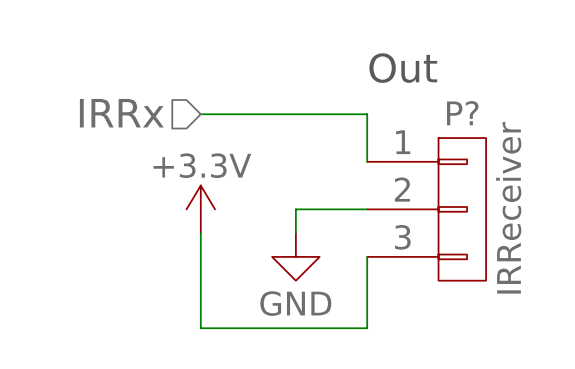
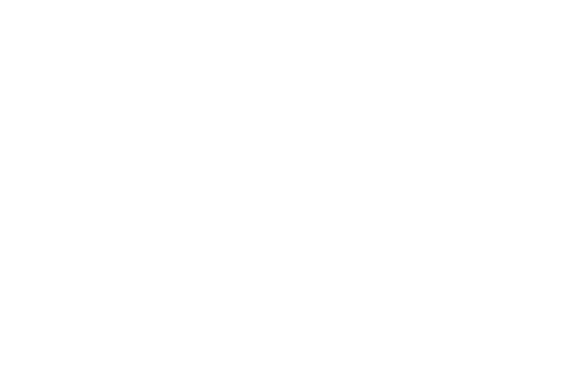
text: Out (403, 68) -> none
hierarchical label: IRRx (121, 113) -> none
wire: (200, 114) (367, 114) (367, 161) -> none
power symbol: +3.3V (200, 209) -> none
wire: (367, 209) (295, 209) (295, 233) -> none
P?: IRReceiver (426, 209) -> none
wire: (200, 233) (200, 328) (367, 328) (367, 256) -> none
power symbol: GND (295, 256) -> none

